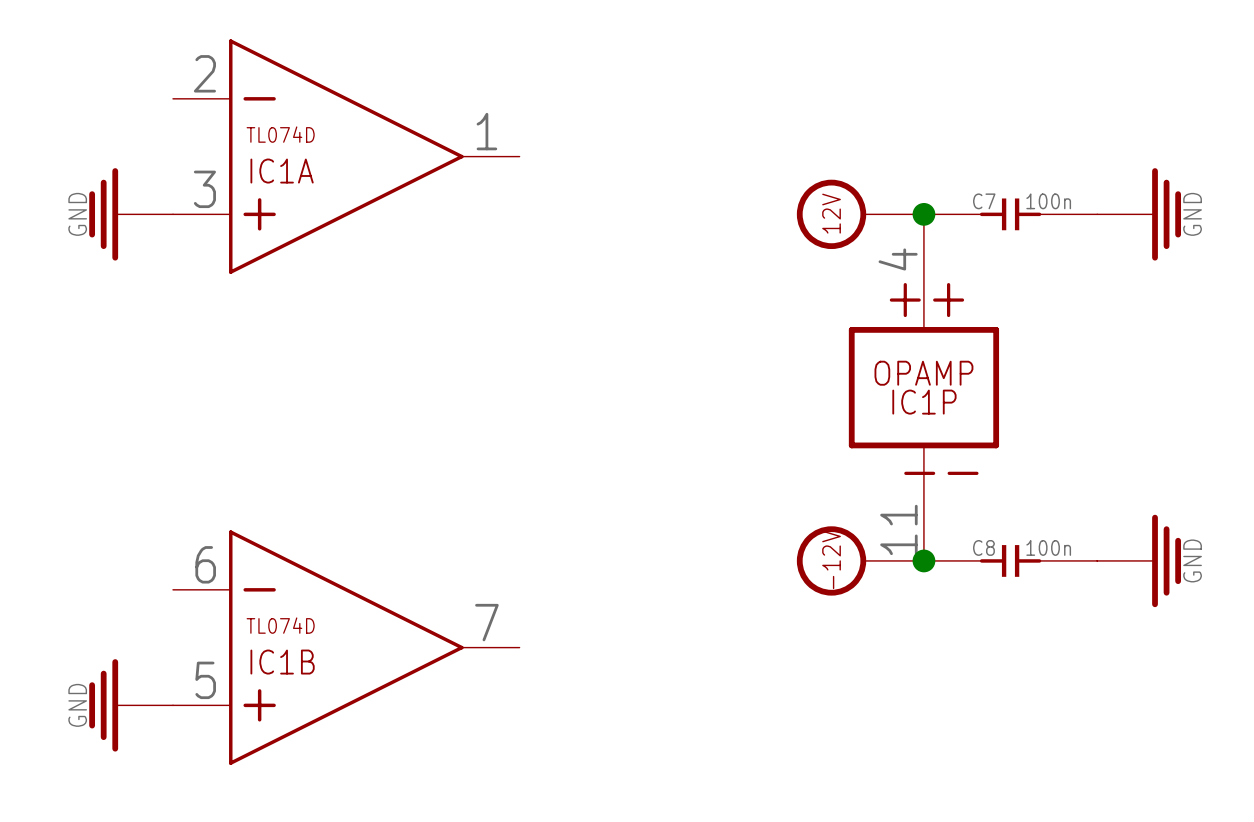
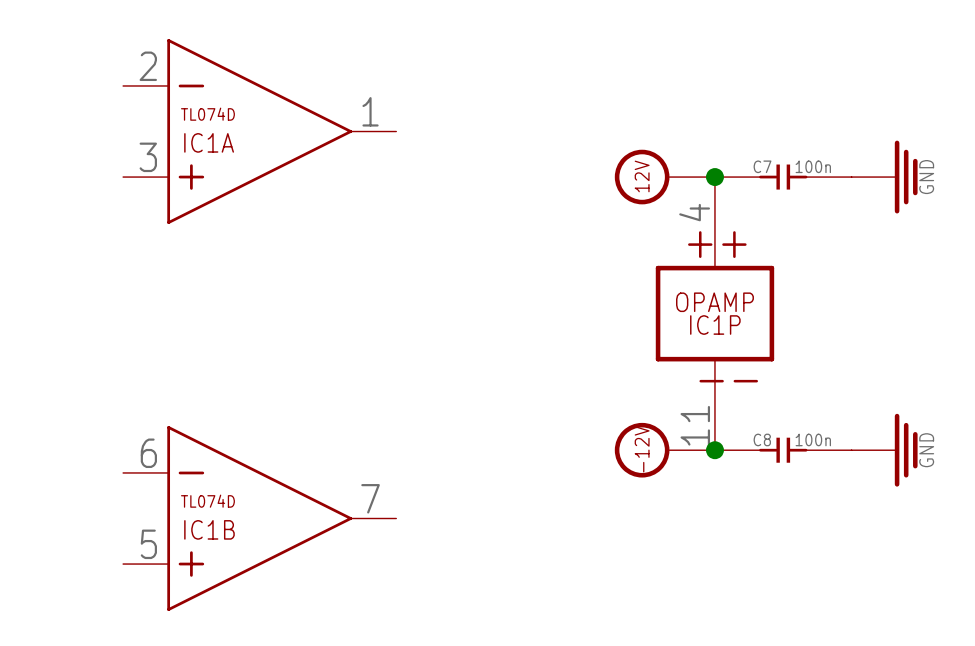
power symbol: GND (131, 214) -> none
power symbol: GND (131, 705) -> none

